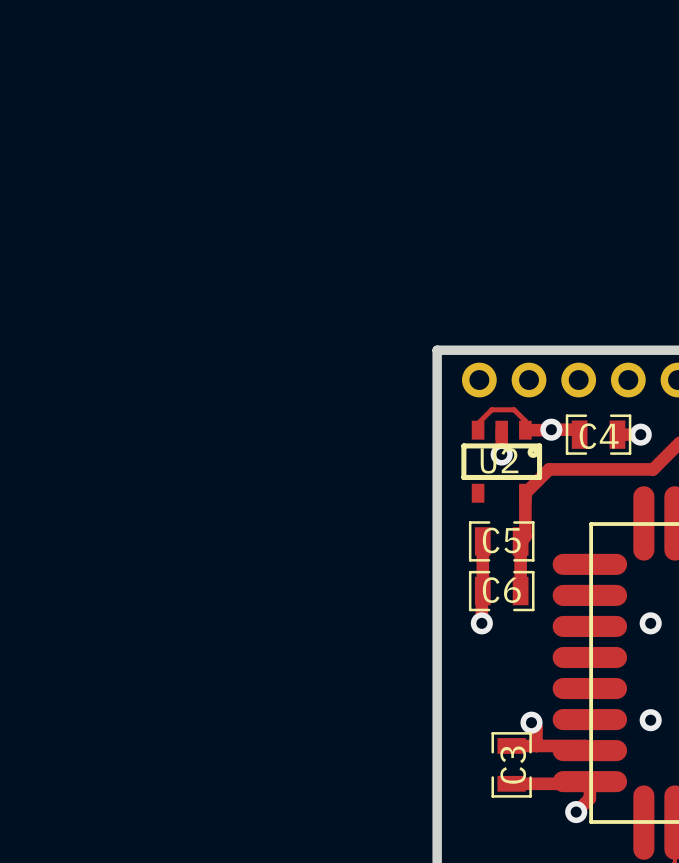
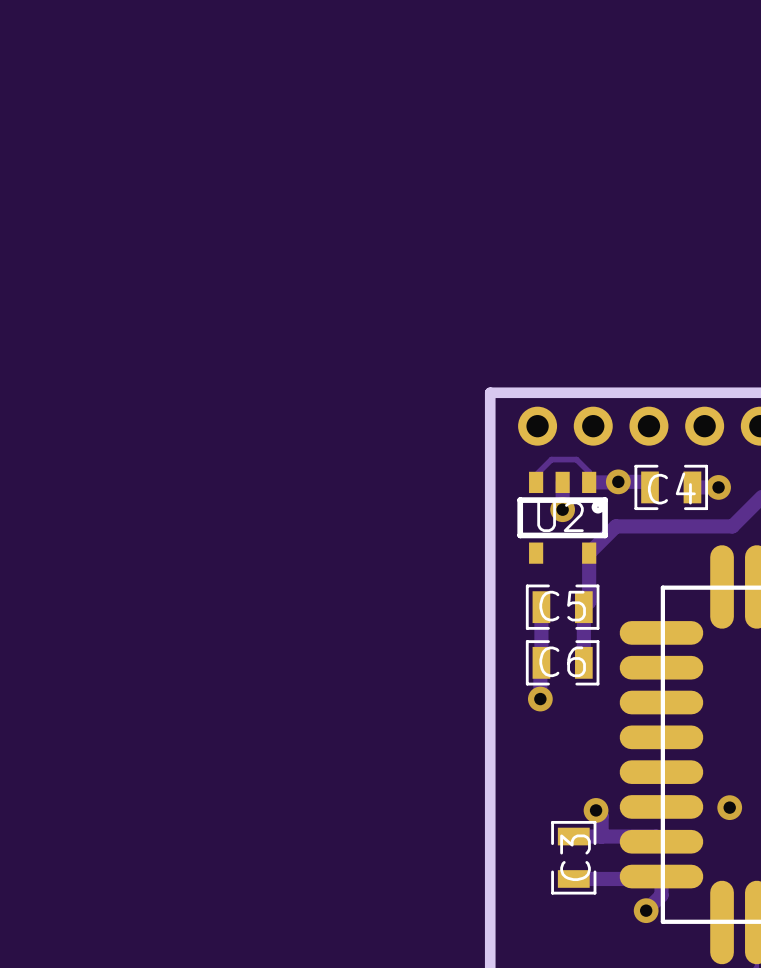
via: (650, 623) -> none

